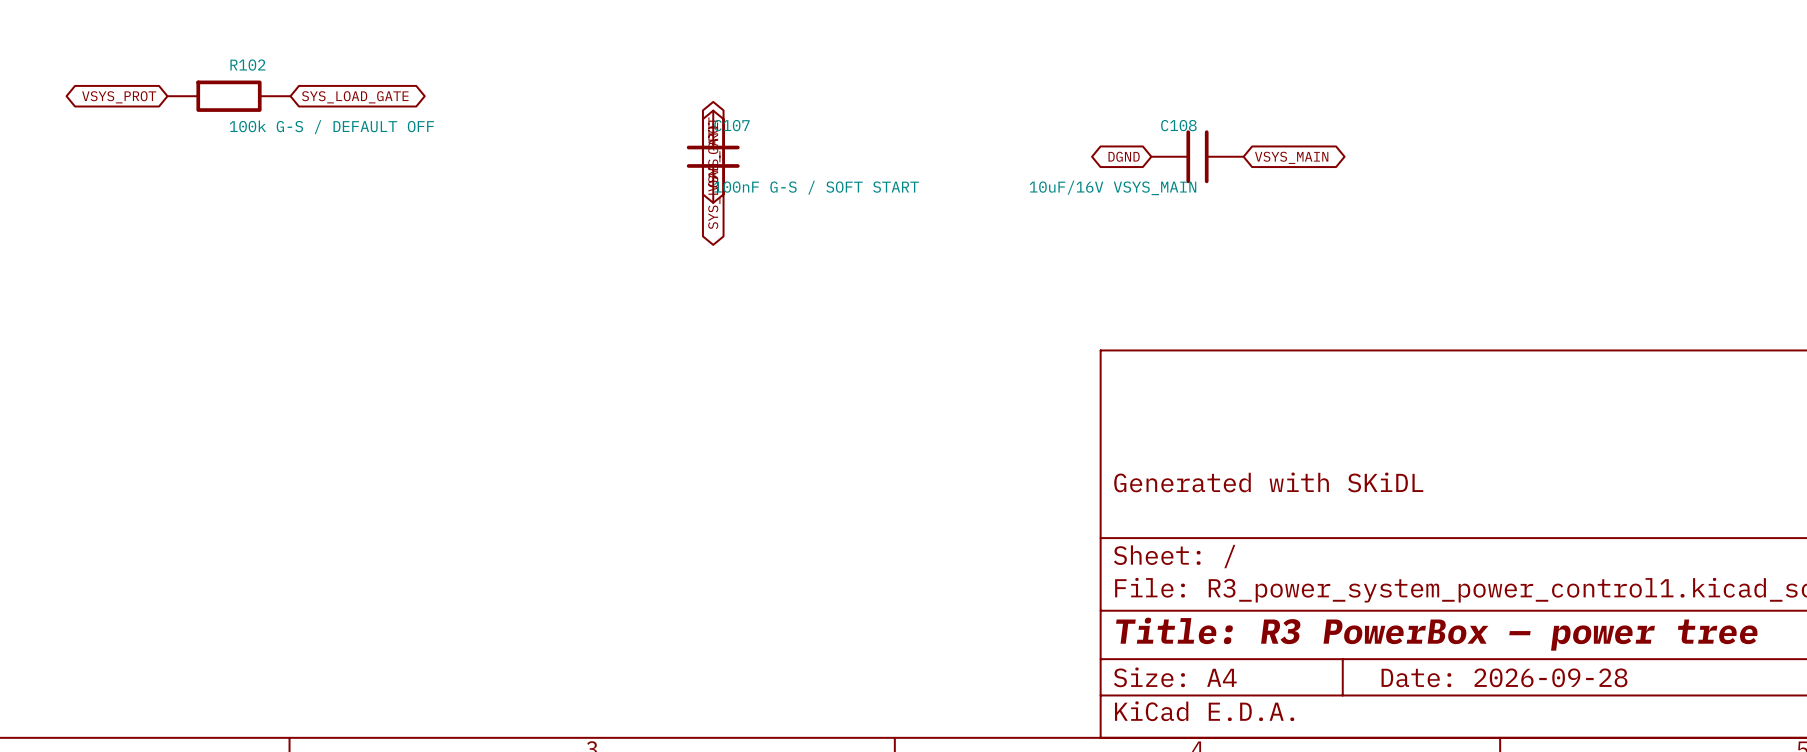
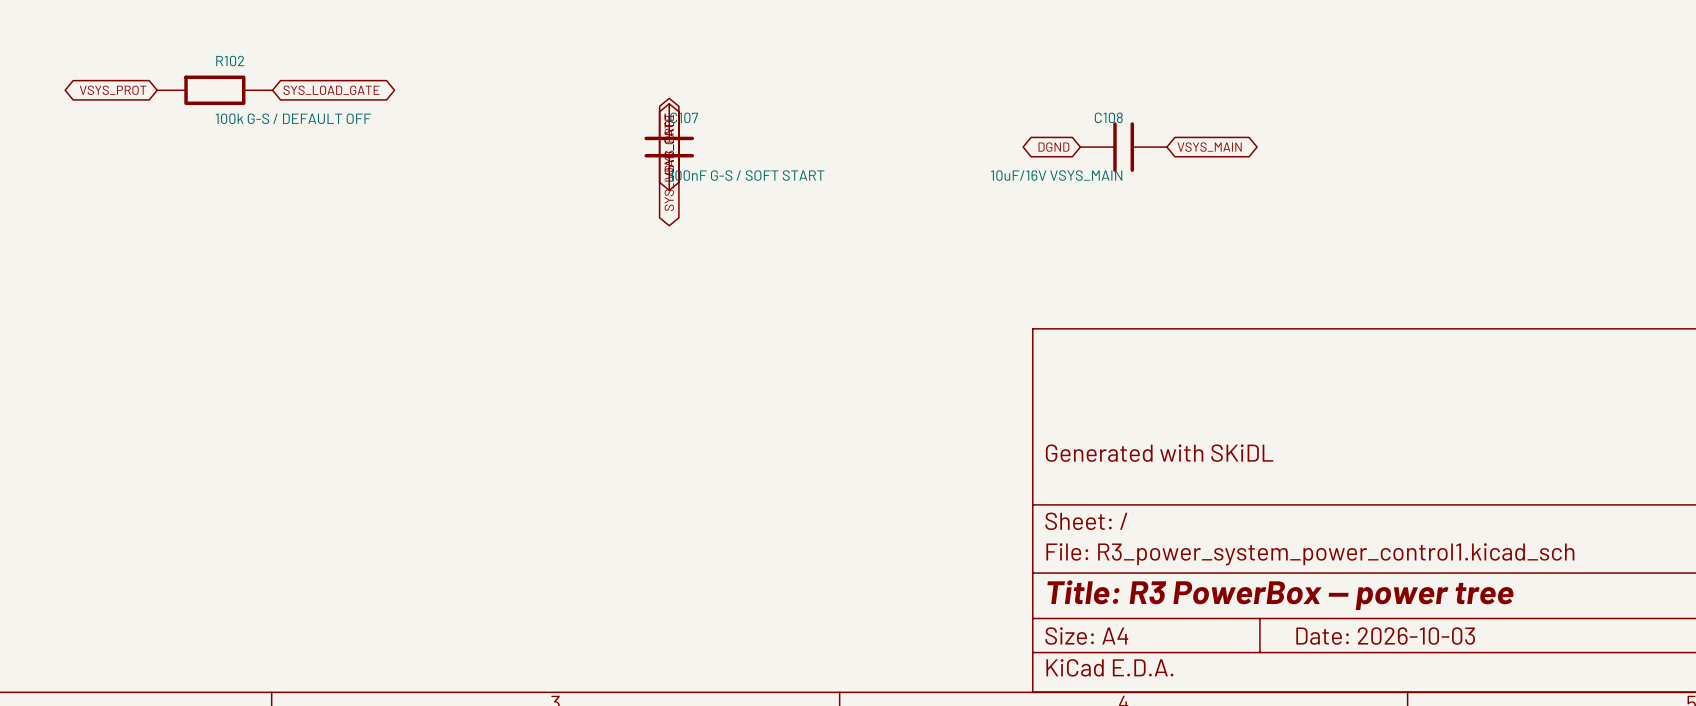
title block: Date: 2026-09-28 (1504, 677) -> Date: 2026-10-03 (1385, 636)

